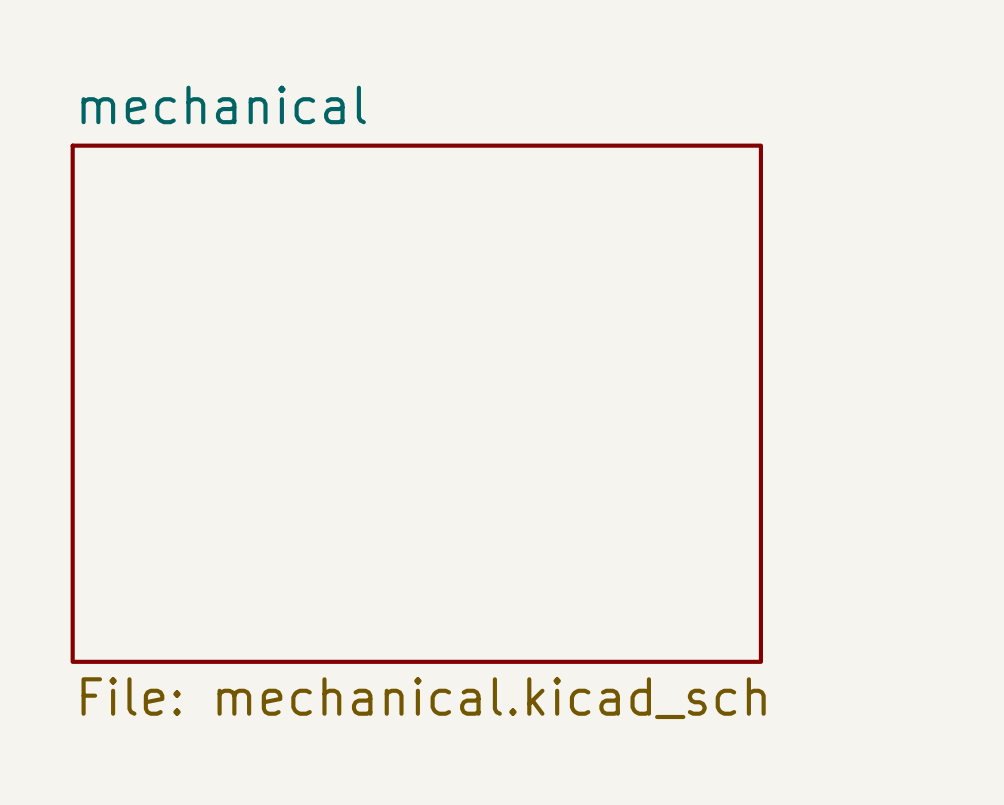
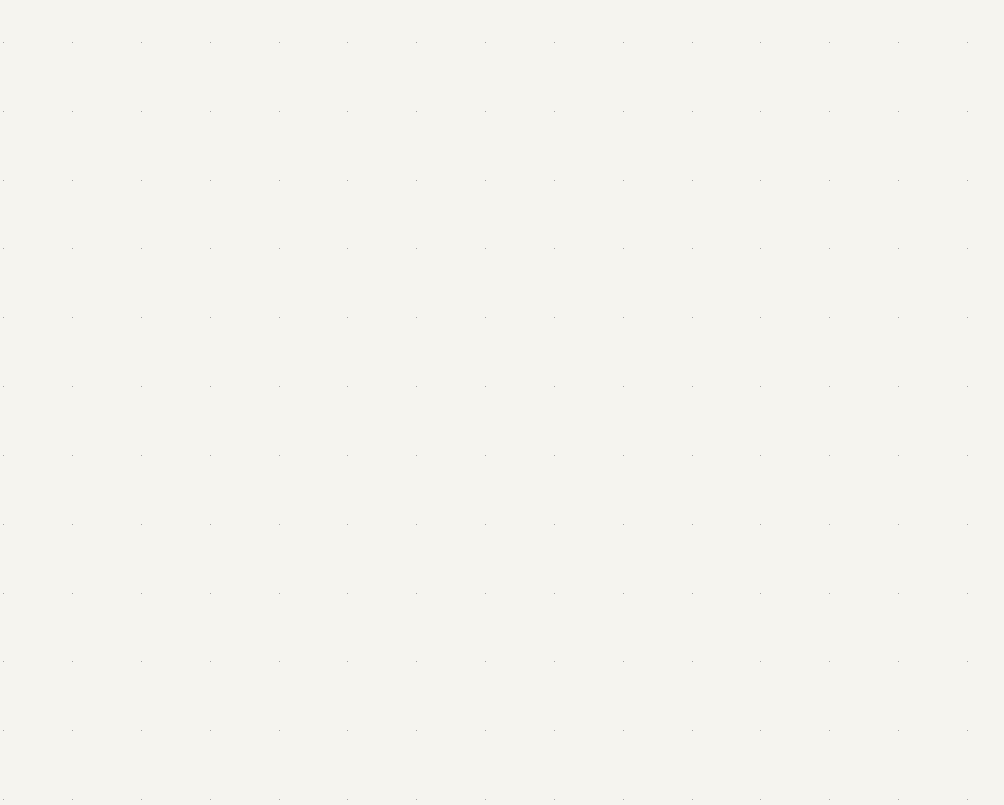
sheet mechanical: File: mechanical.kicad_sch (416, 403) -> none

